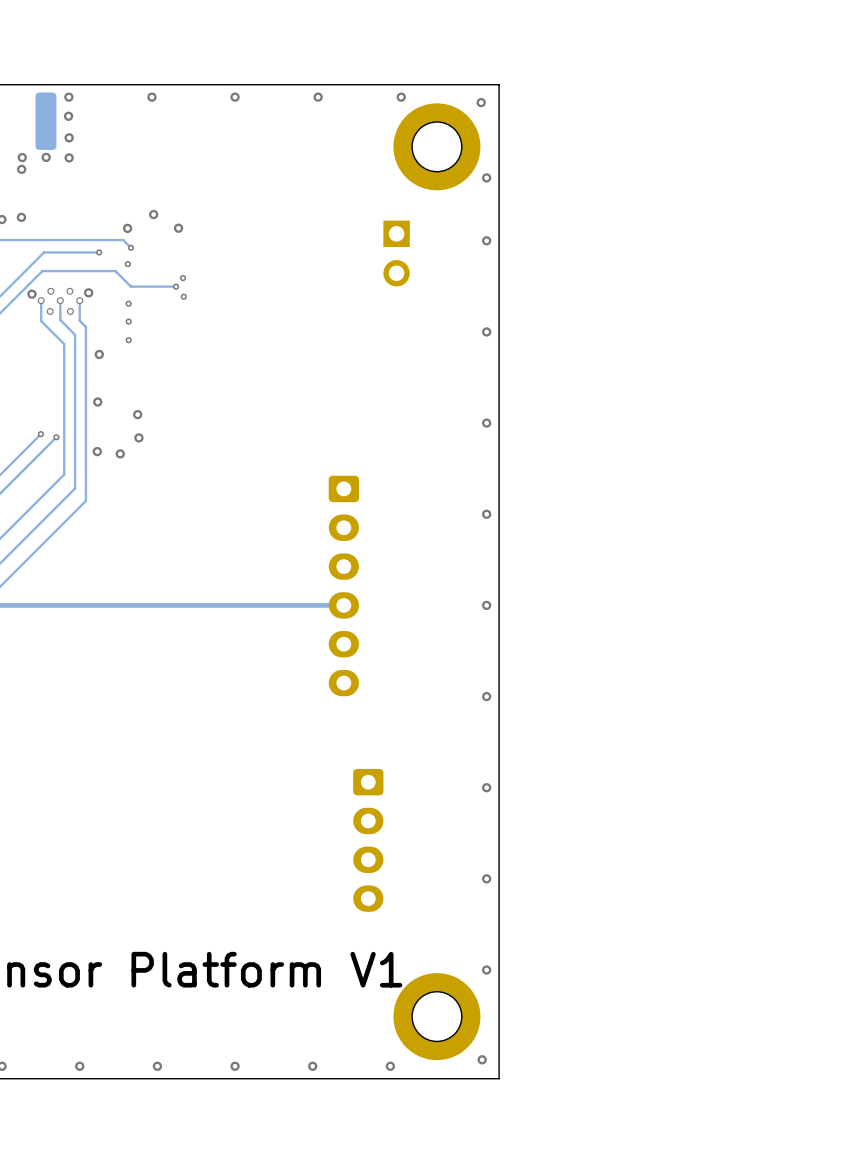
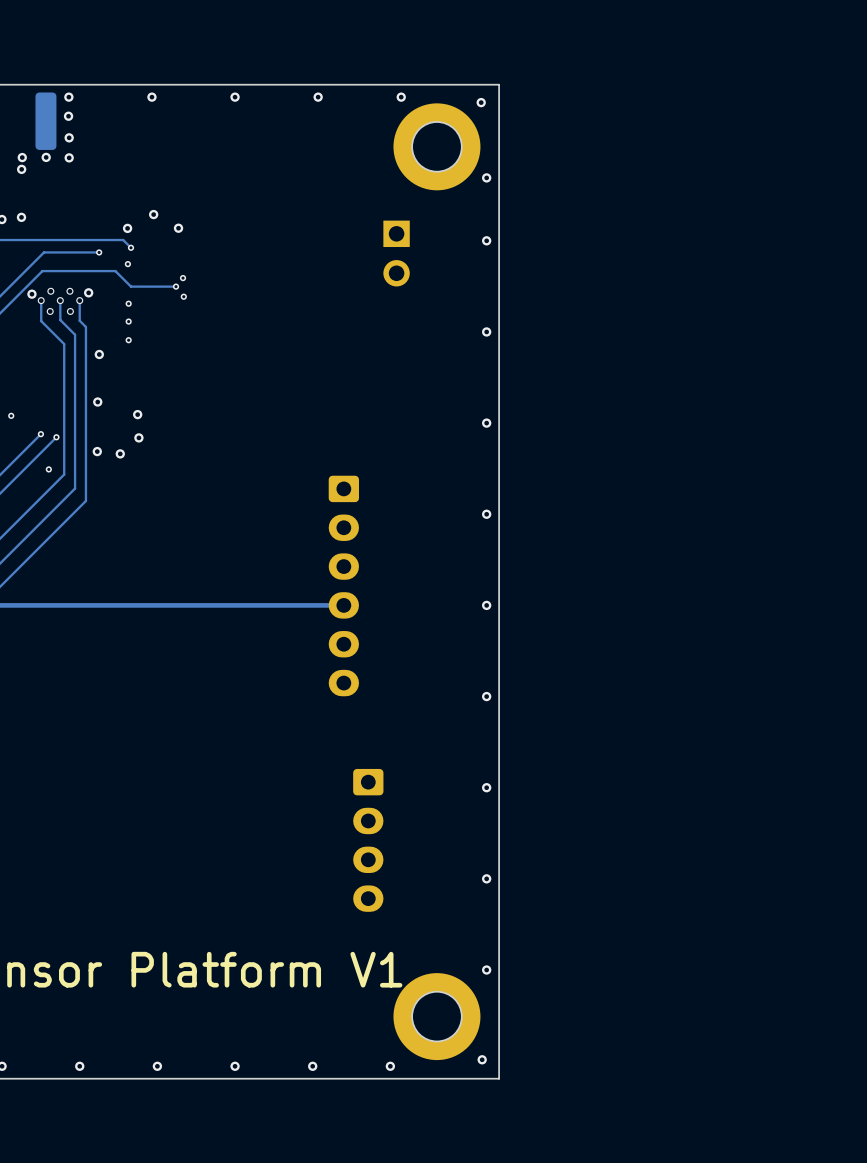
via: none -> (11, 415)
via: none -> (48, 469)

